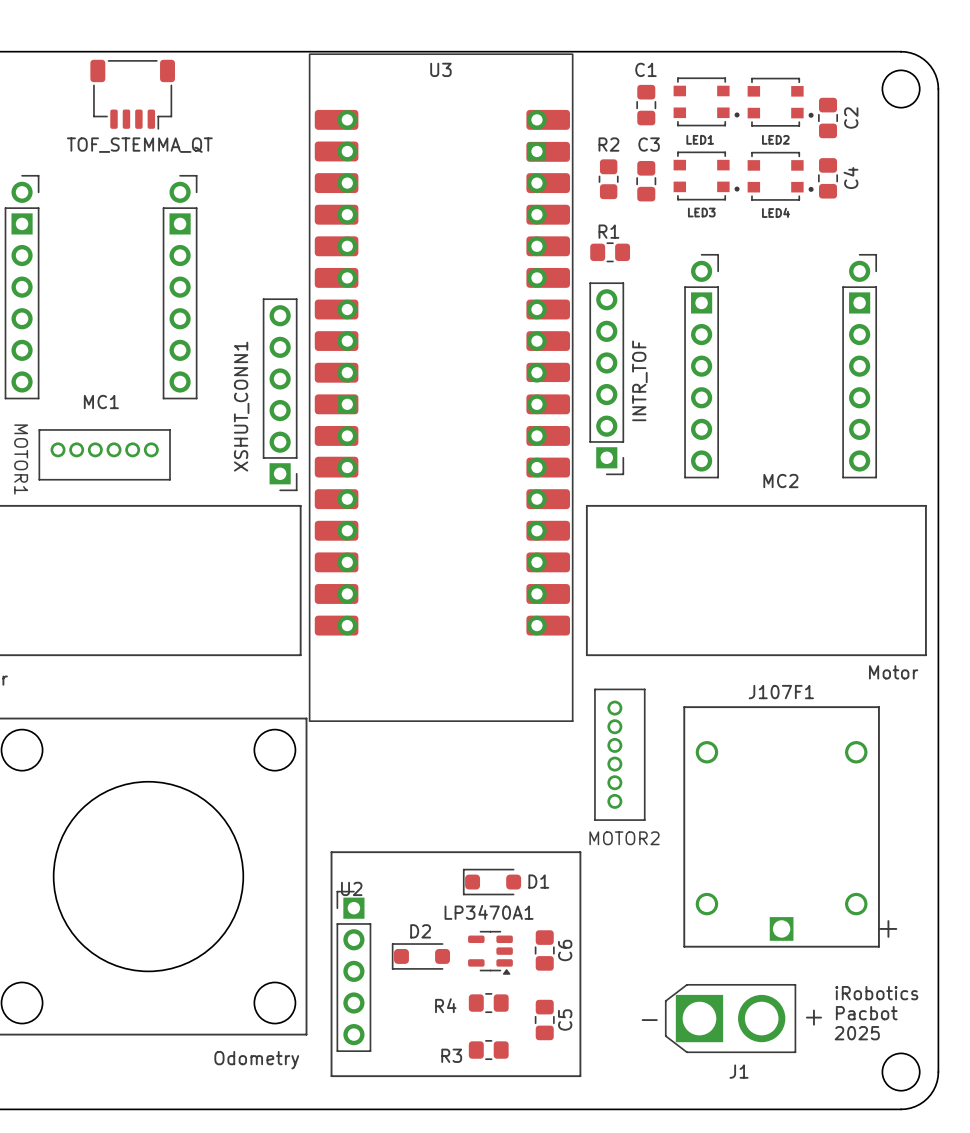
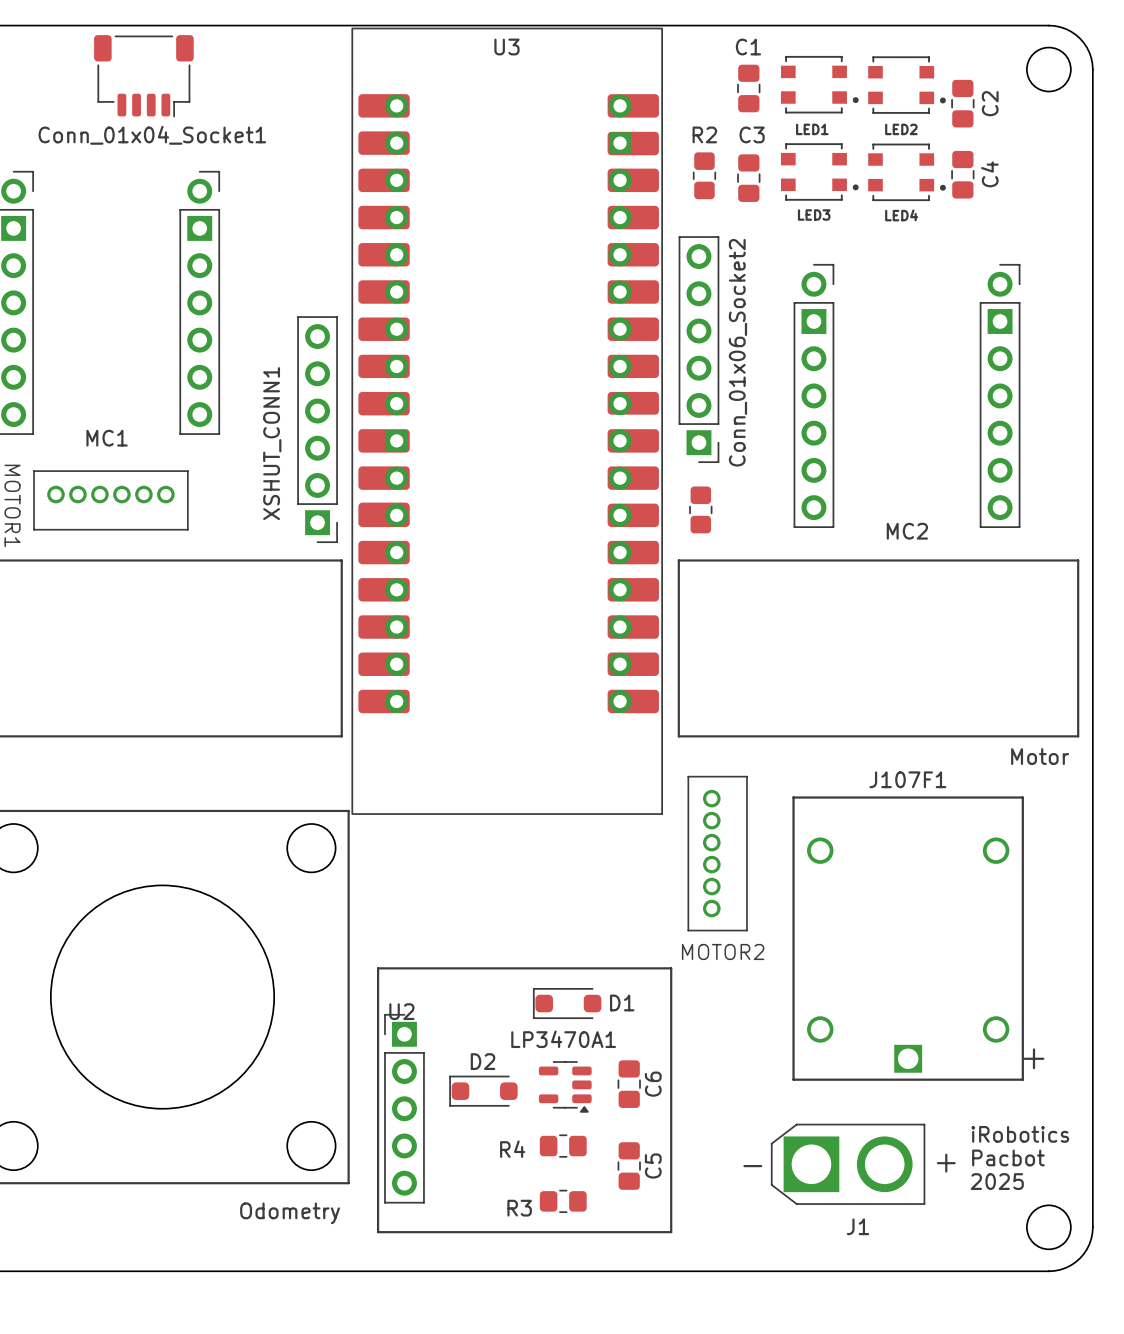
TOF_STEMMA_QT name: TOF_STEMMA_QT (139, 145) -> Conn_01x04_Socket1 (152, 135)
R1: (610, 252) -> none
Conn_01x06_Socket2: none -> (698, 349)
INTR_TOF: (606, 378) -> none
part: none -> (700, 509)

